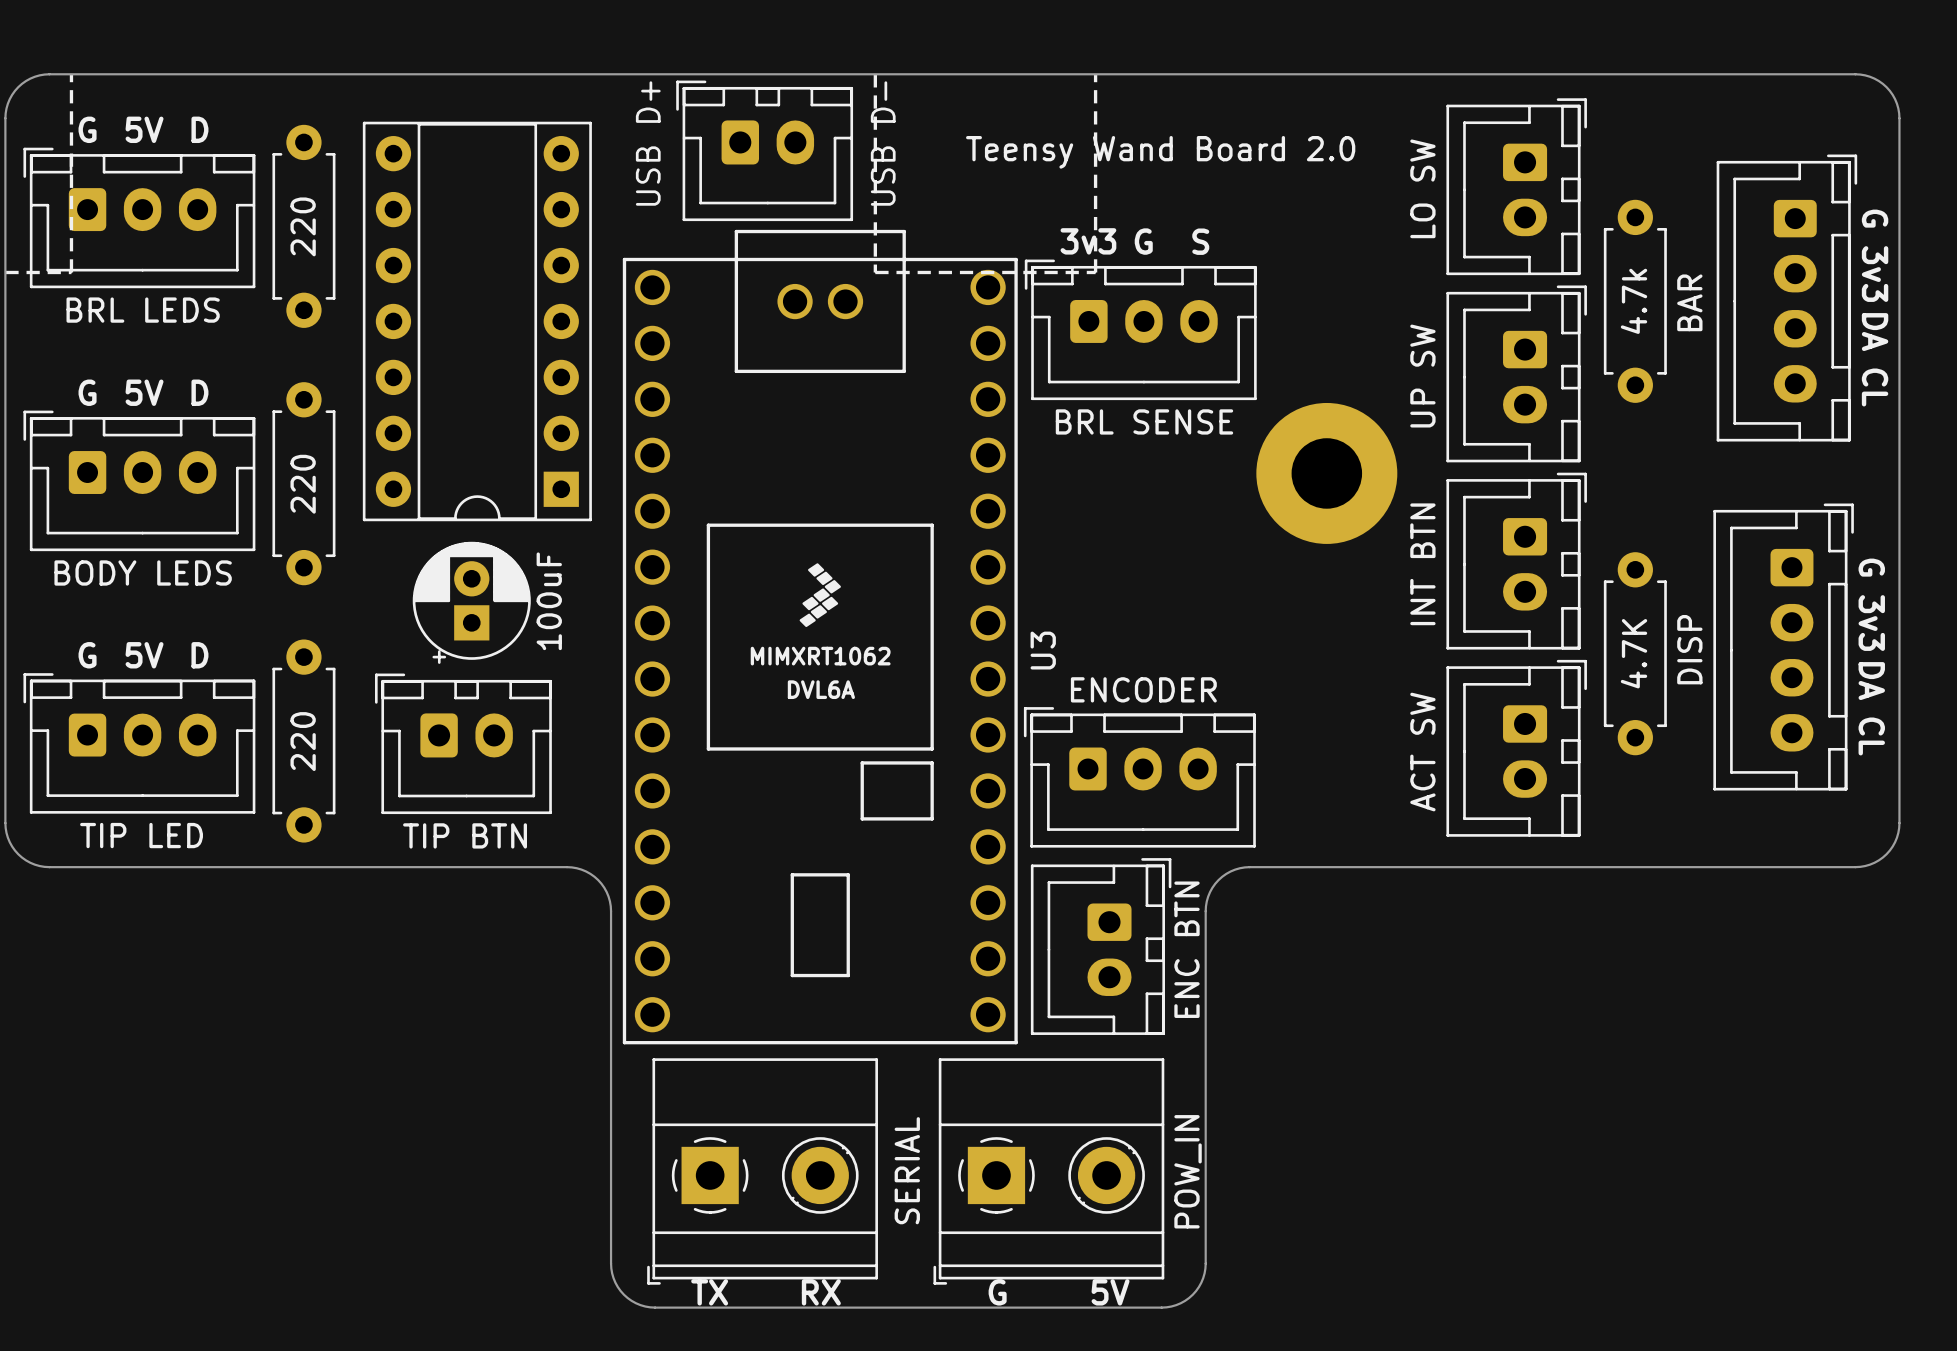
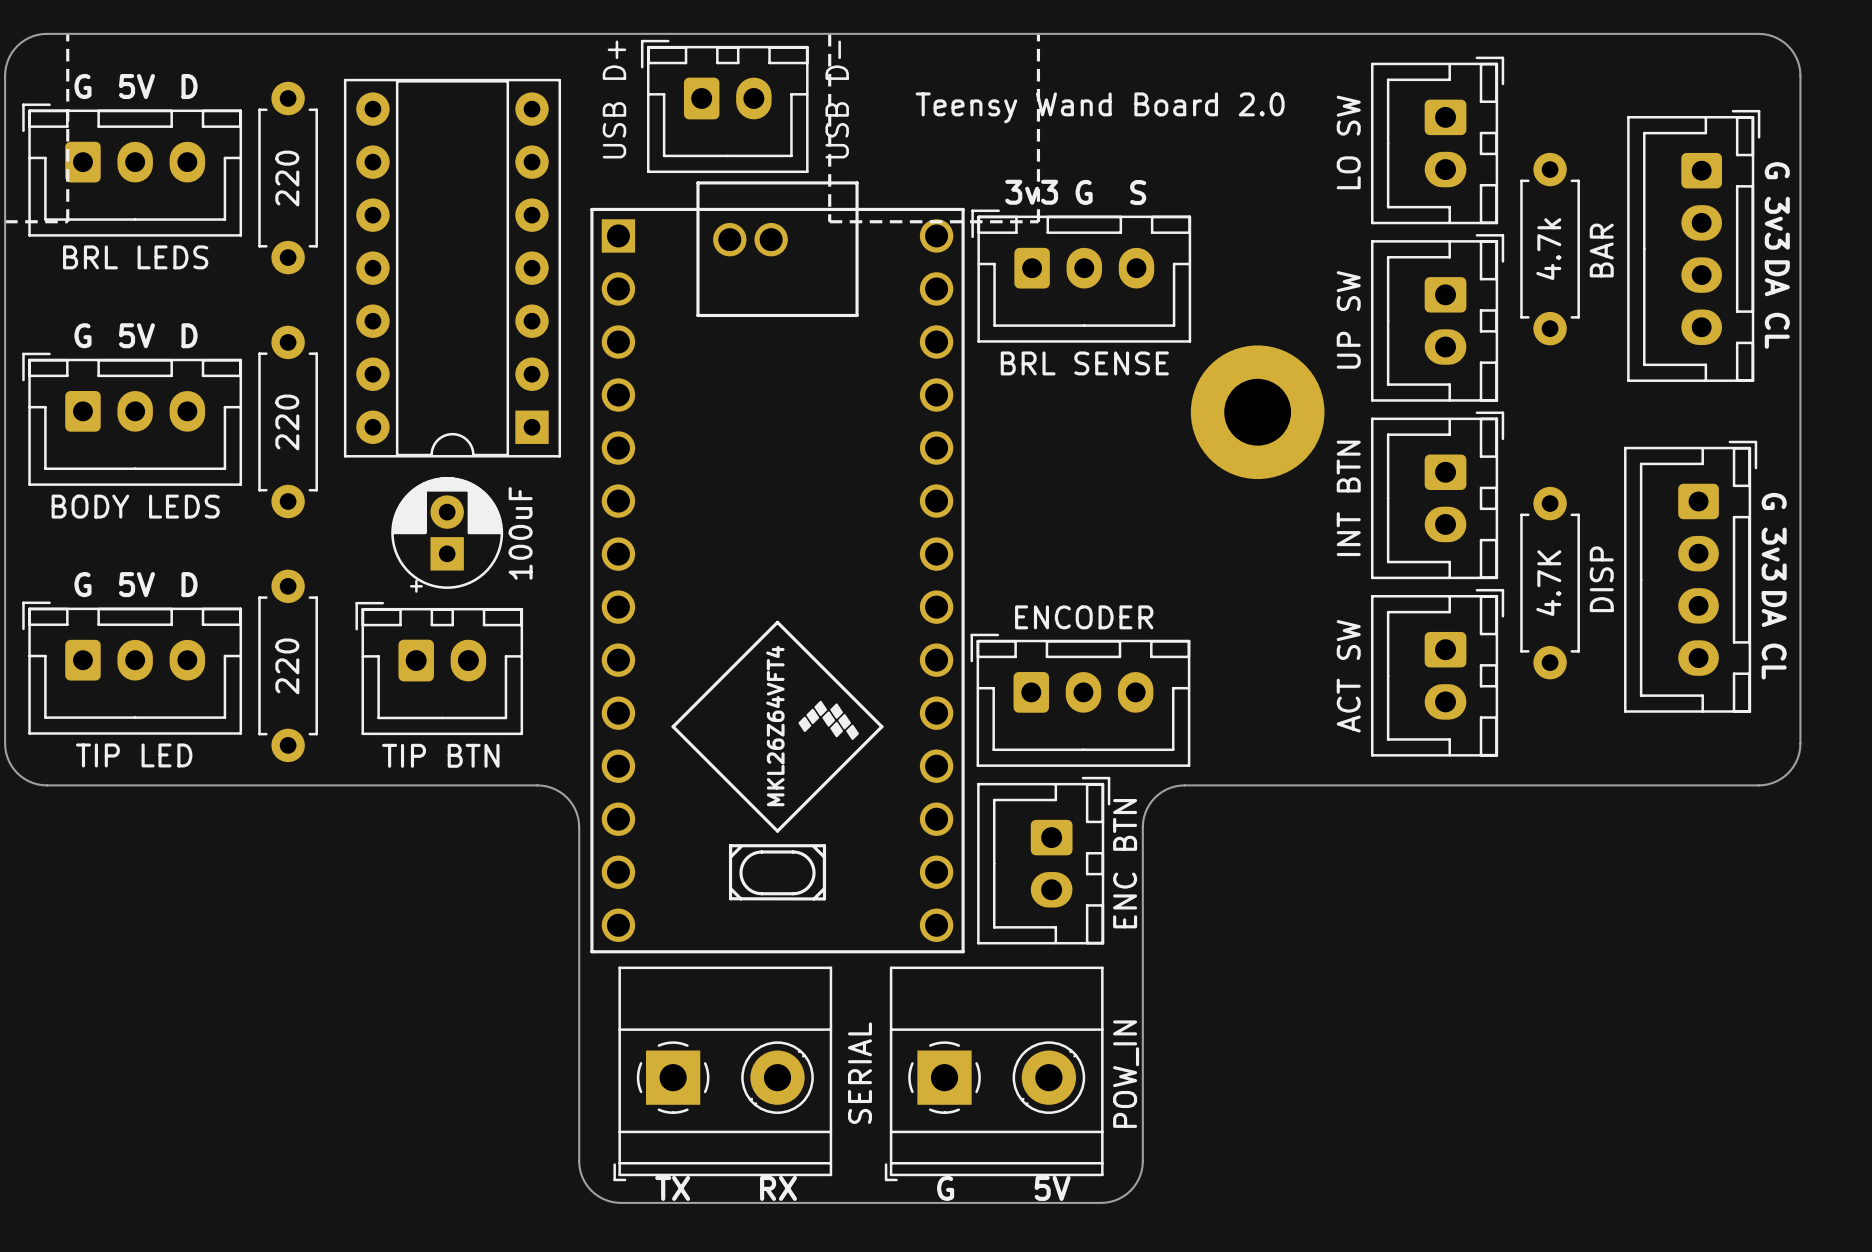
U3: (820, 637) -> none
part: none -> (777, 567)

